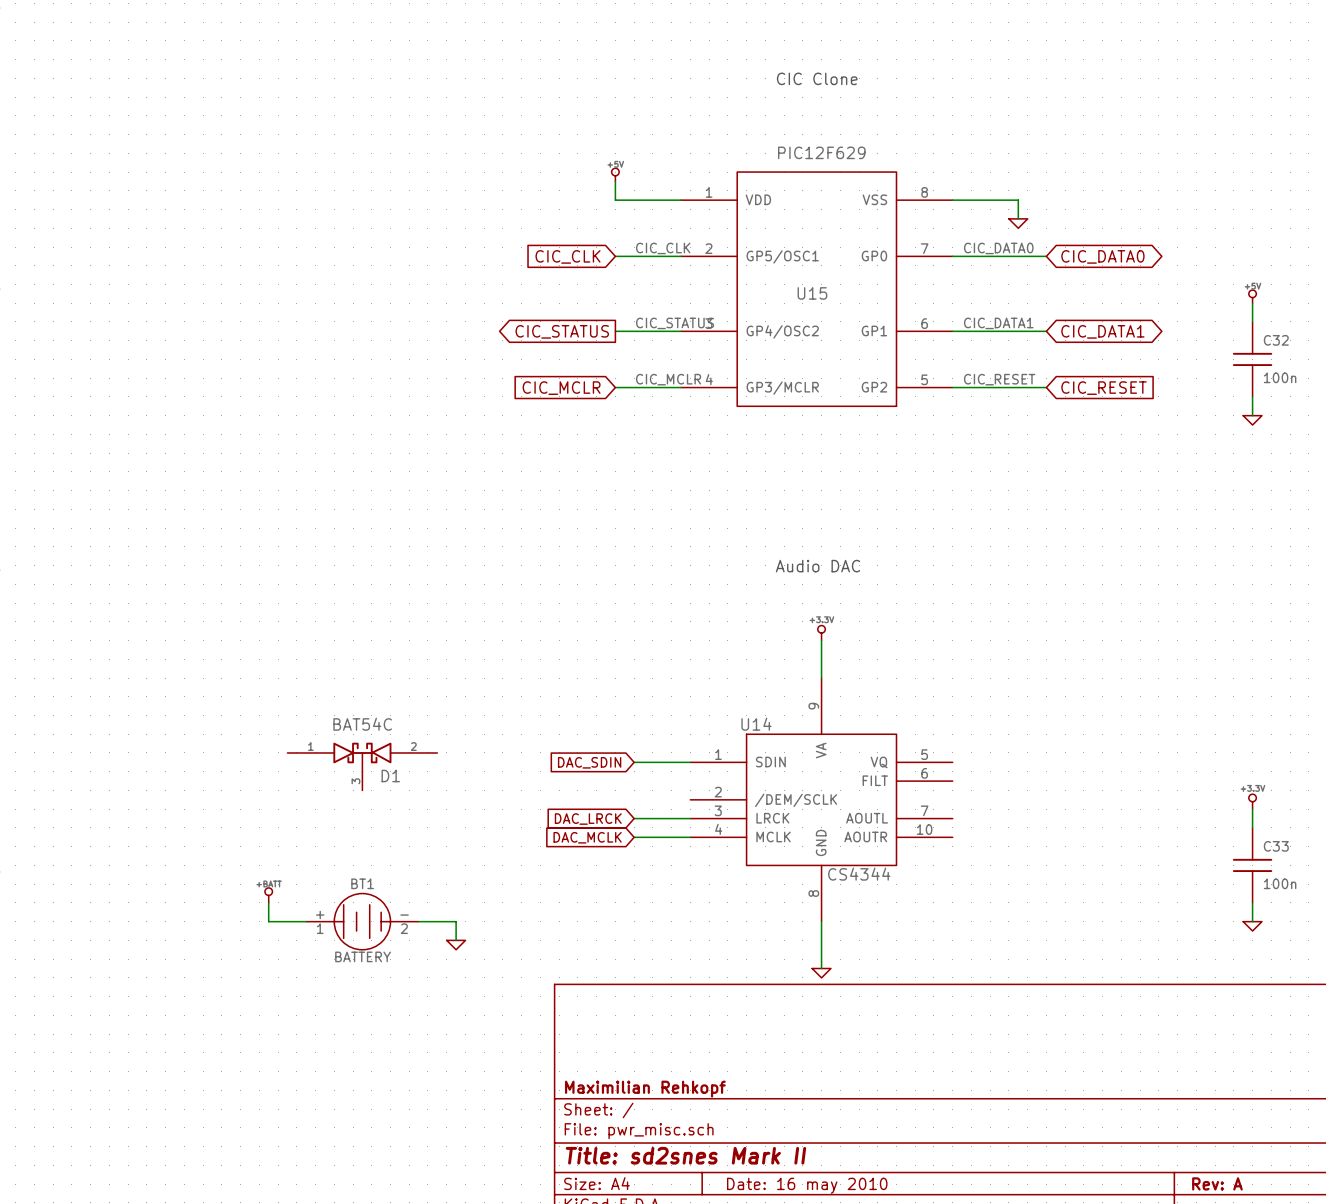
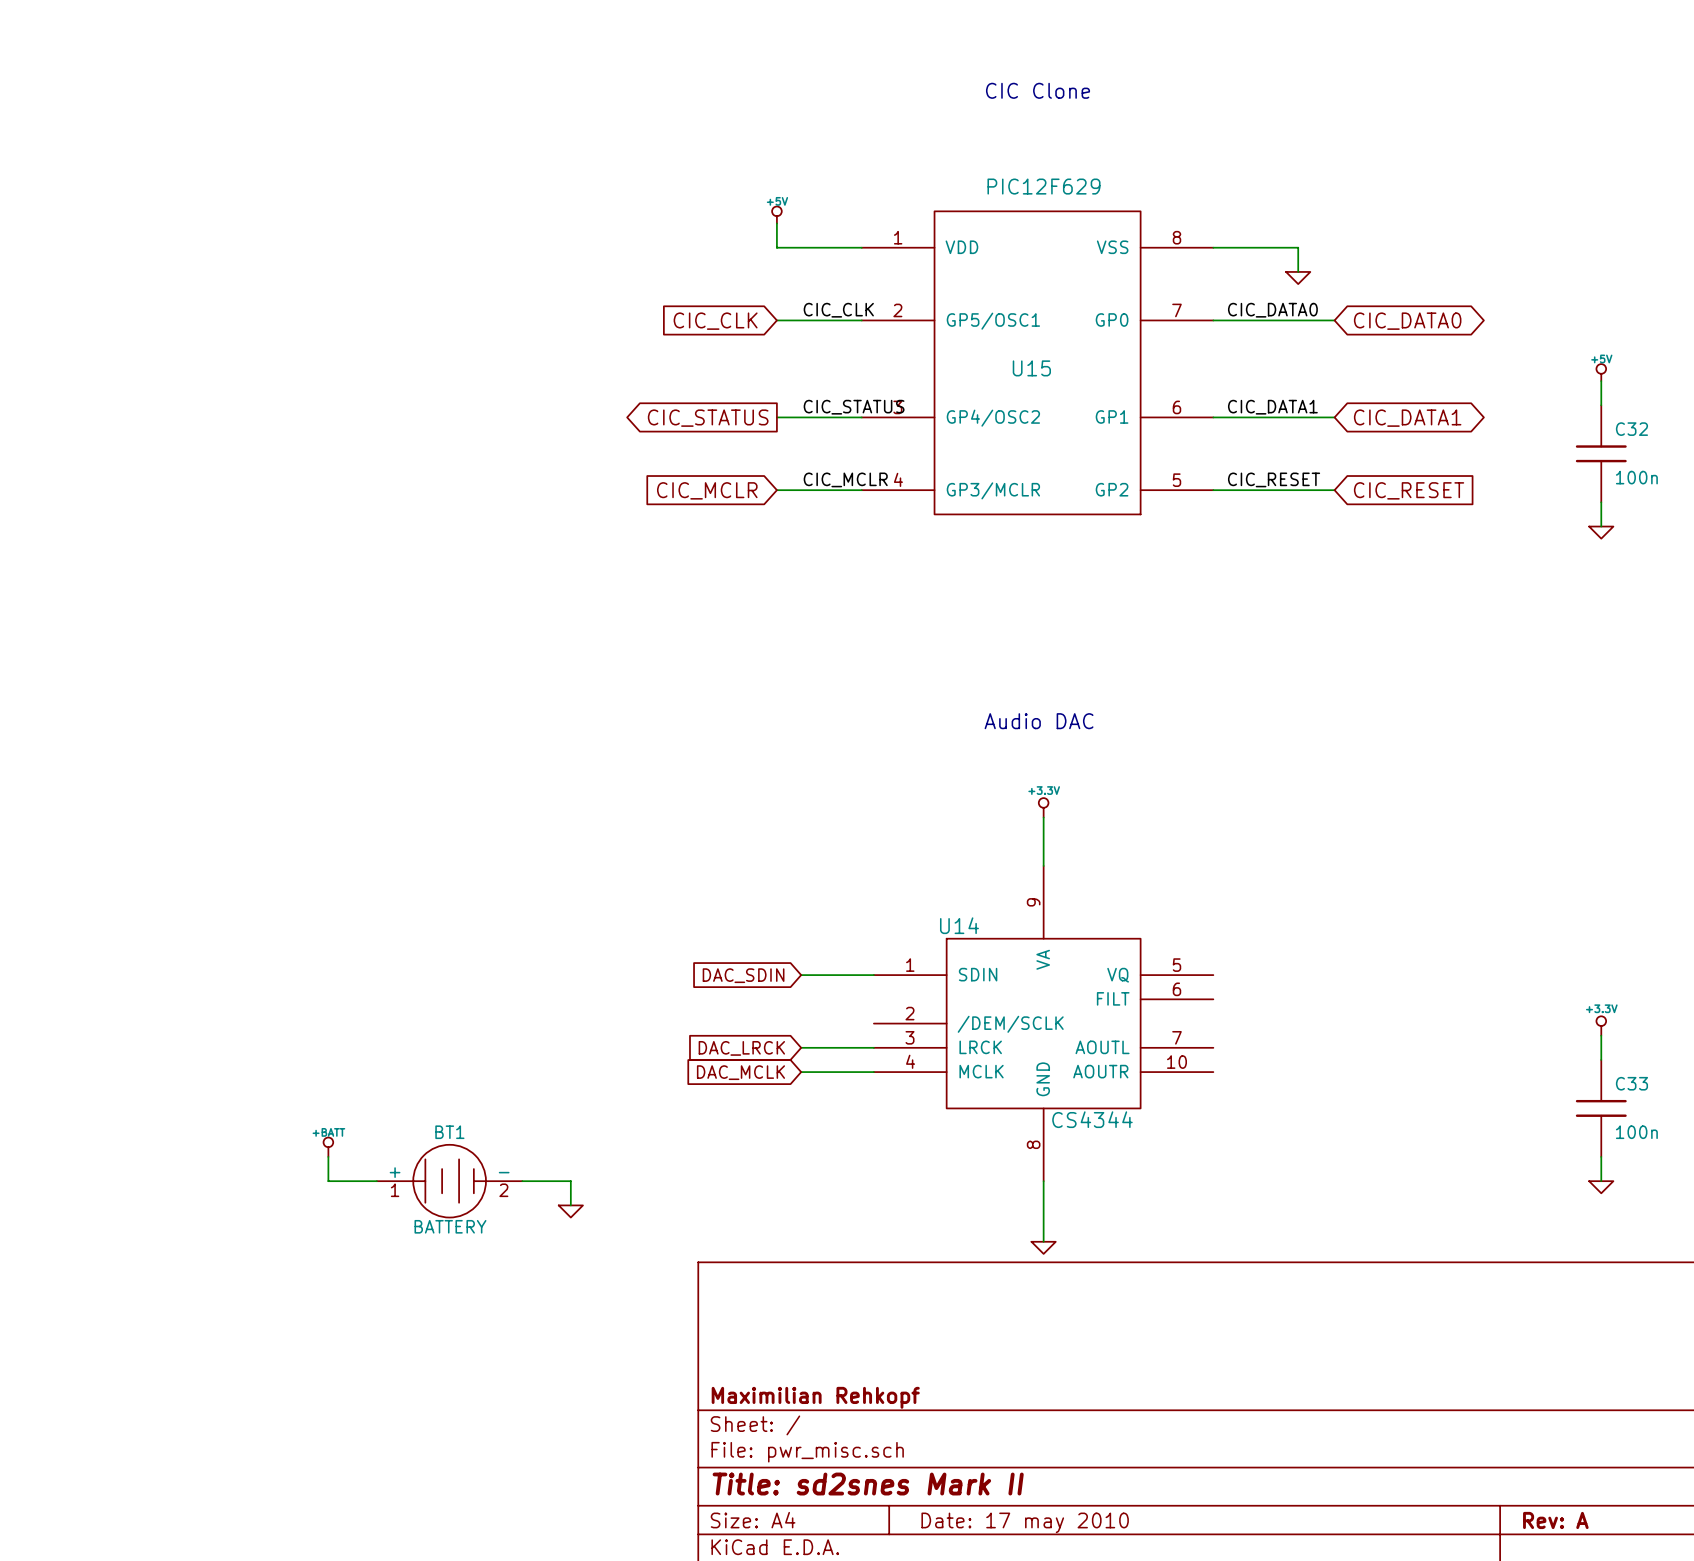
D1: BAT54C (362, 766) -> none
title block: Date: 16 may 2010 (807, 1185) -> Date: 17 may 2010 (1025, 1522)

